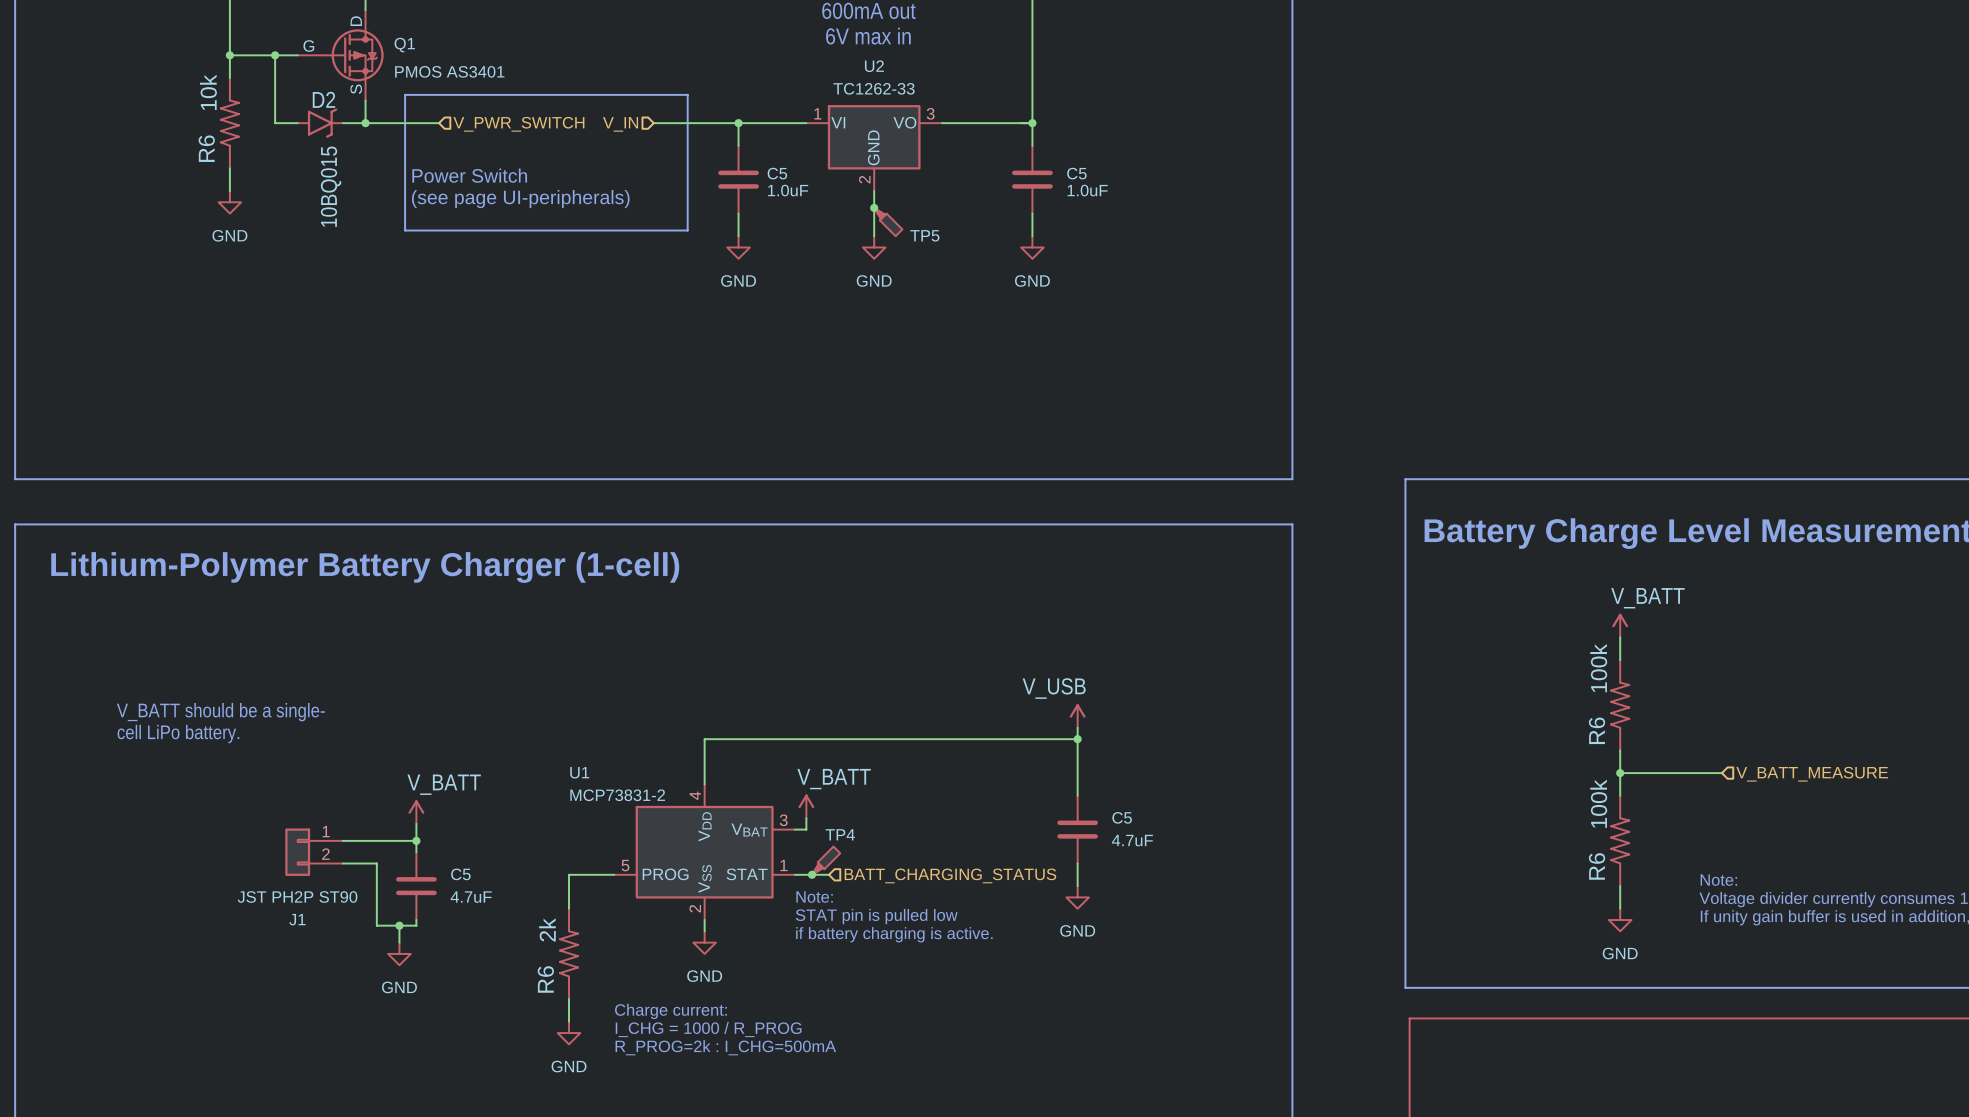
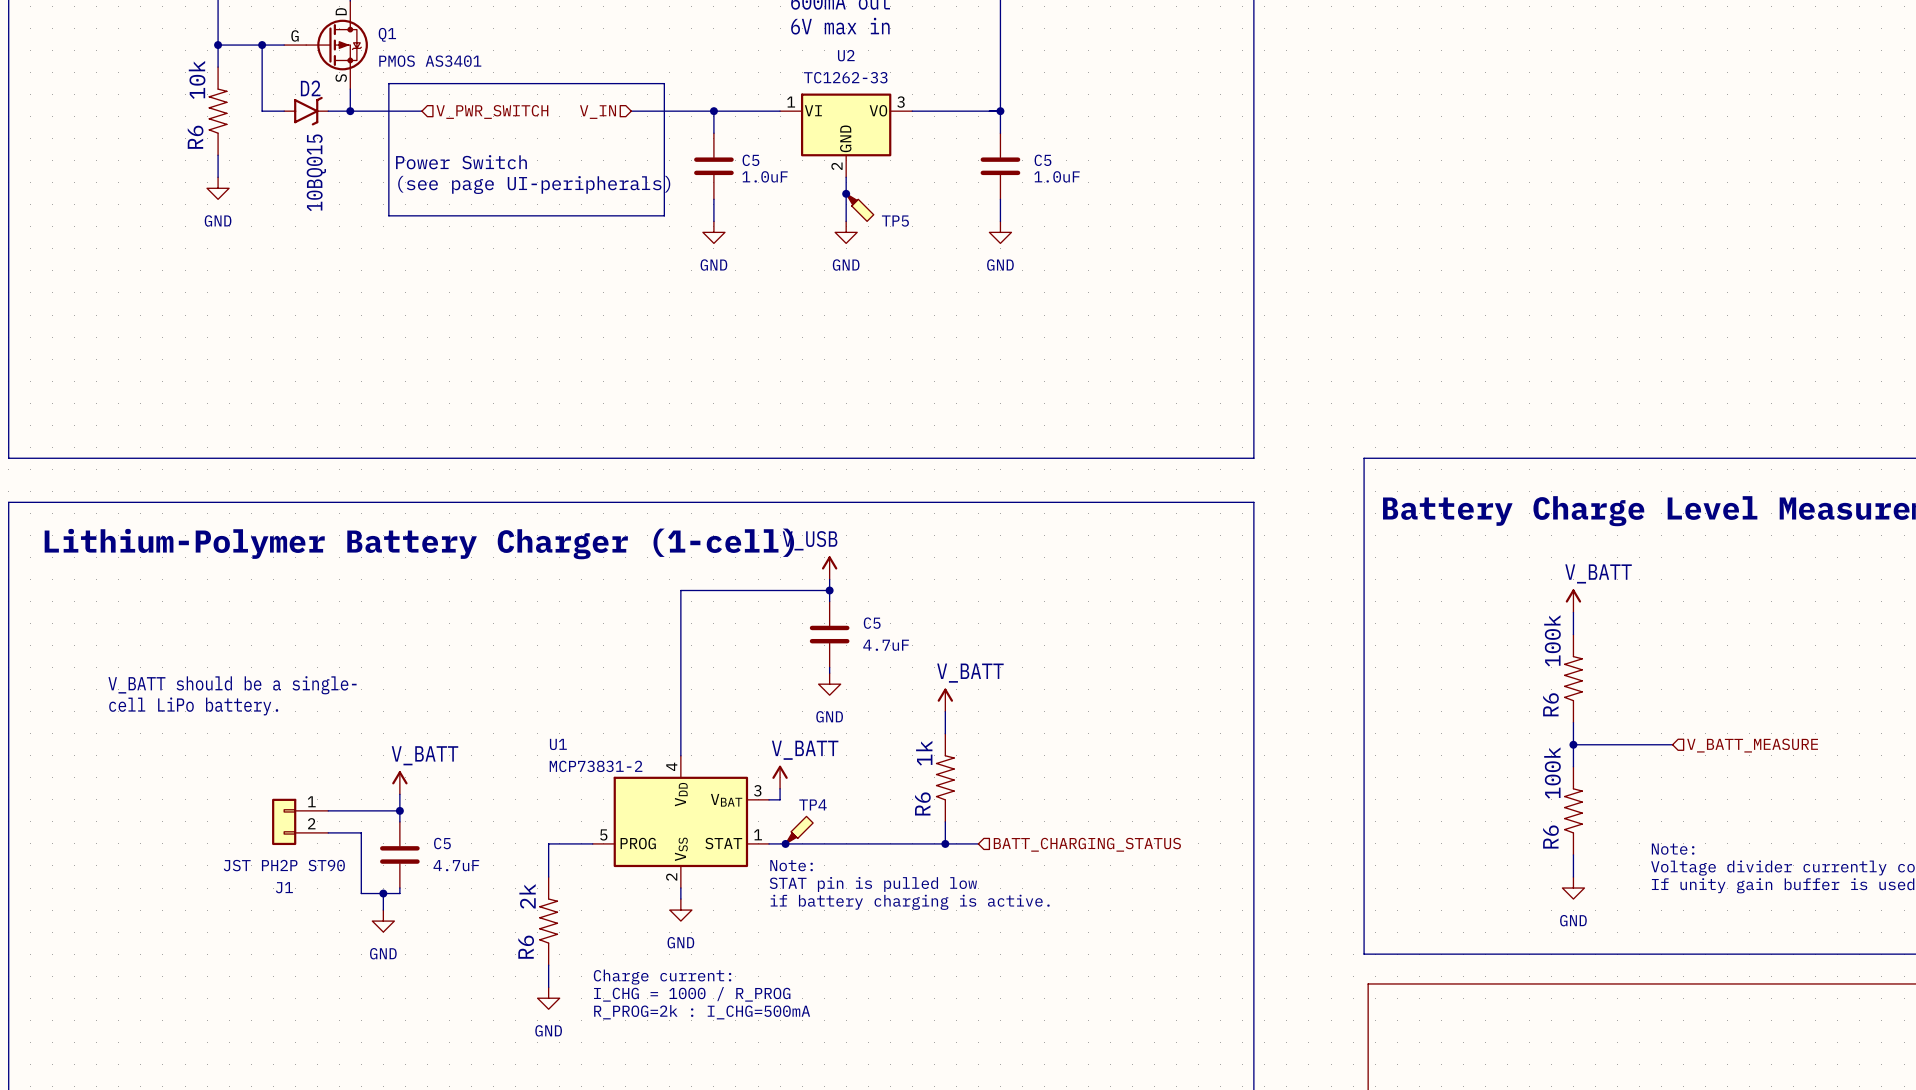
power symbol: none -> V_USB (829, 567)
wire: none -> (829, 579) (829, 601)
junction: none -> (829, 590)
C5: none -> 4.7uF (829, 634)
wire: none -> (829, 667) (829, 673)
power symbol: none -> GND (829, 684)
power symbol: V_USB (1077, 716) -> none
power symbol: none -> V_BATT (945, 700)
wire: (1077, 727) (1077, 795) -> none
wire: (704, 739) (1077, 739) -> (680, 711) (680, 590) (829, 590)
wire: none -> (945, 711) (945, 733)
junction: (1077, 739) -> none
R6: none -> 1k (945, 777)
C5: 4.7uF (1077, 829) -> none
wire: (1077, 863) (1077, 886) -> (945, 821) (945, 843)
wire: none -> (802, 843) (978, 843)
junction: none -> (945, 843)
hierarchical label position: BATT_CHARGING_STATUS (950, 875) -> BATT_CHARGING_STATUS (1087, 844)
power symbol: GND (1077, 897) -> none

